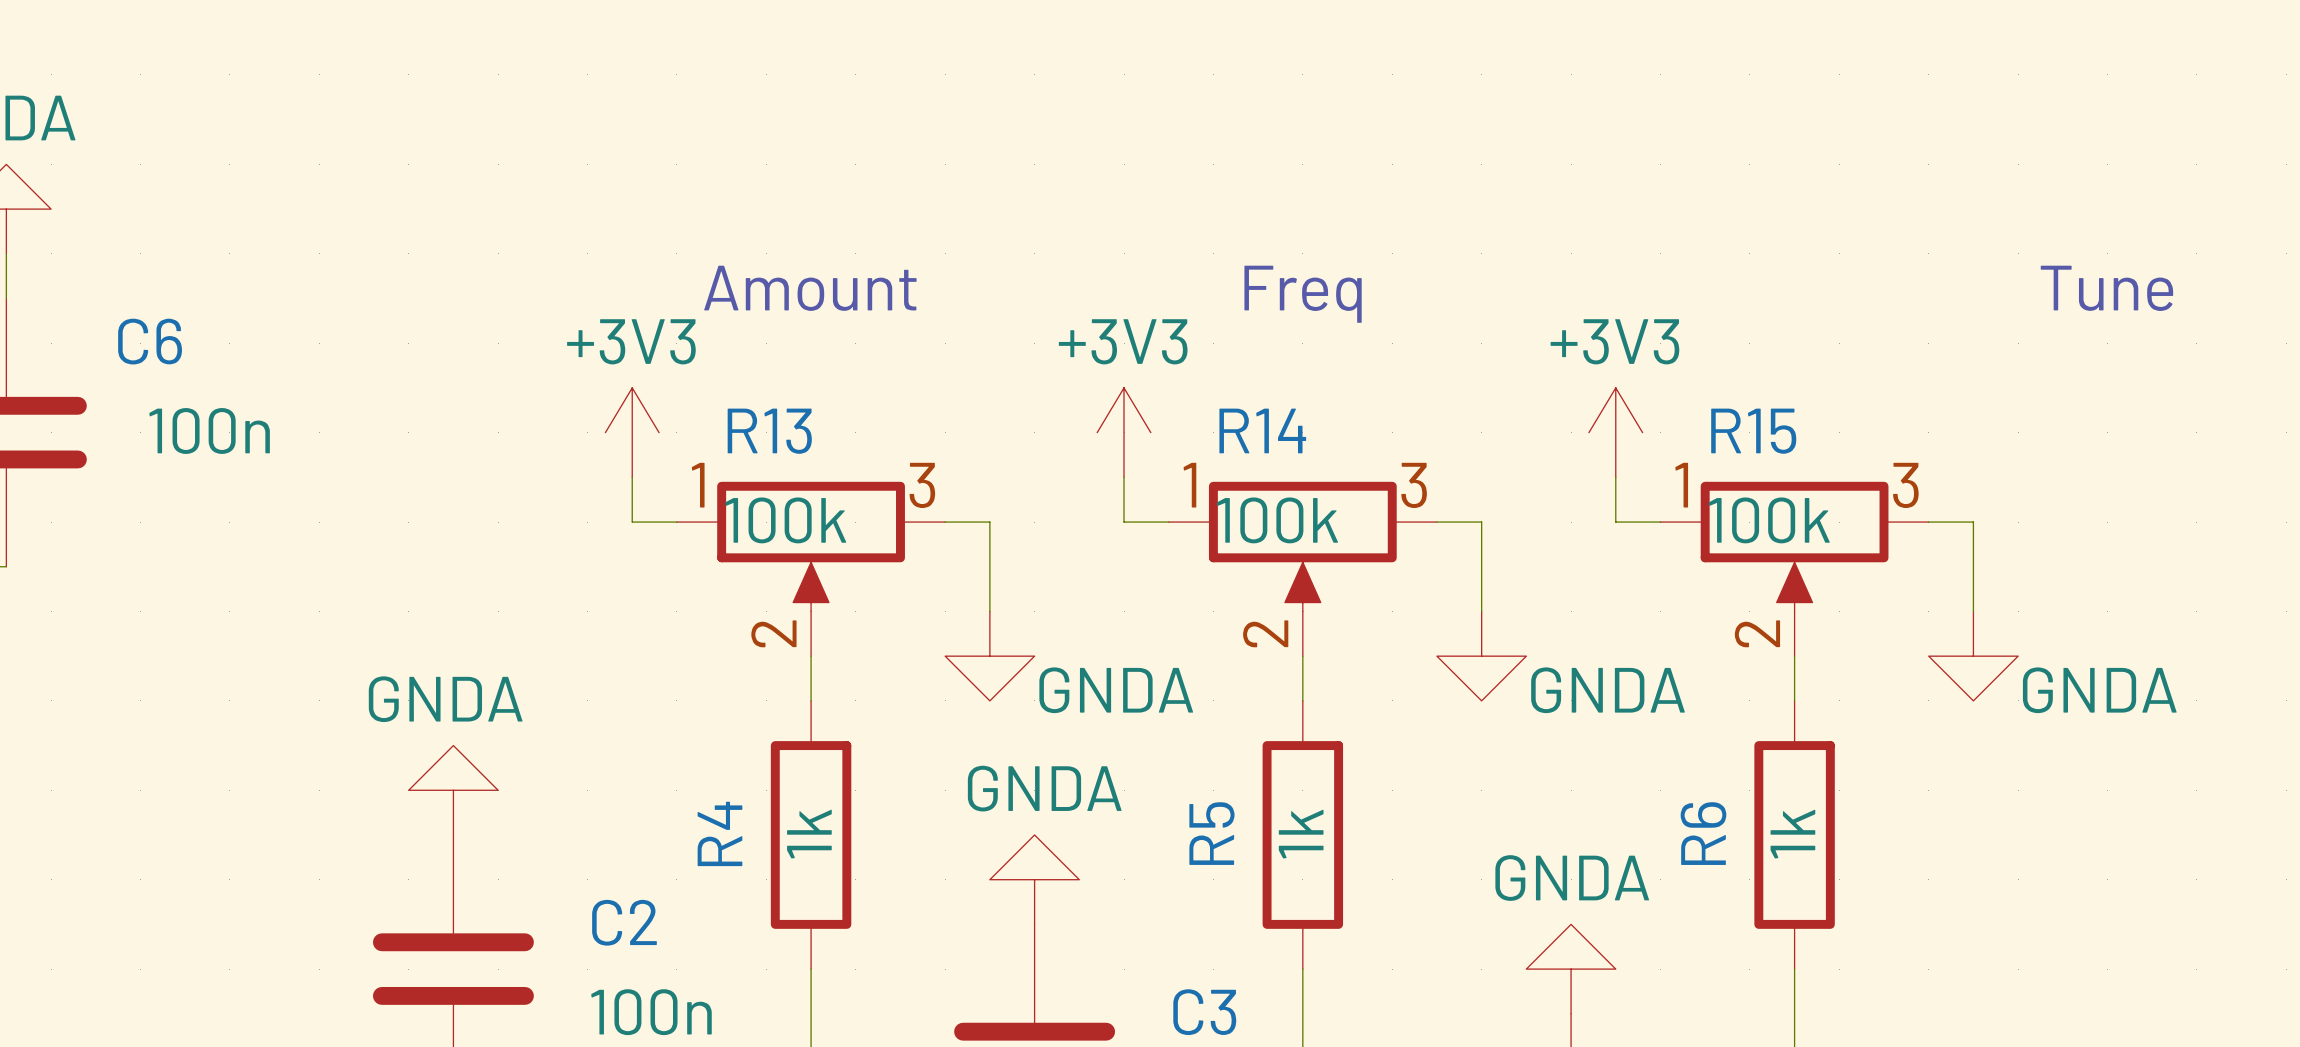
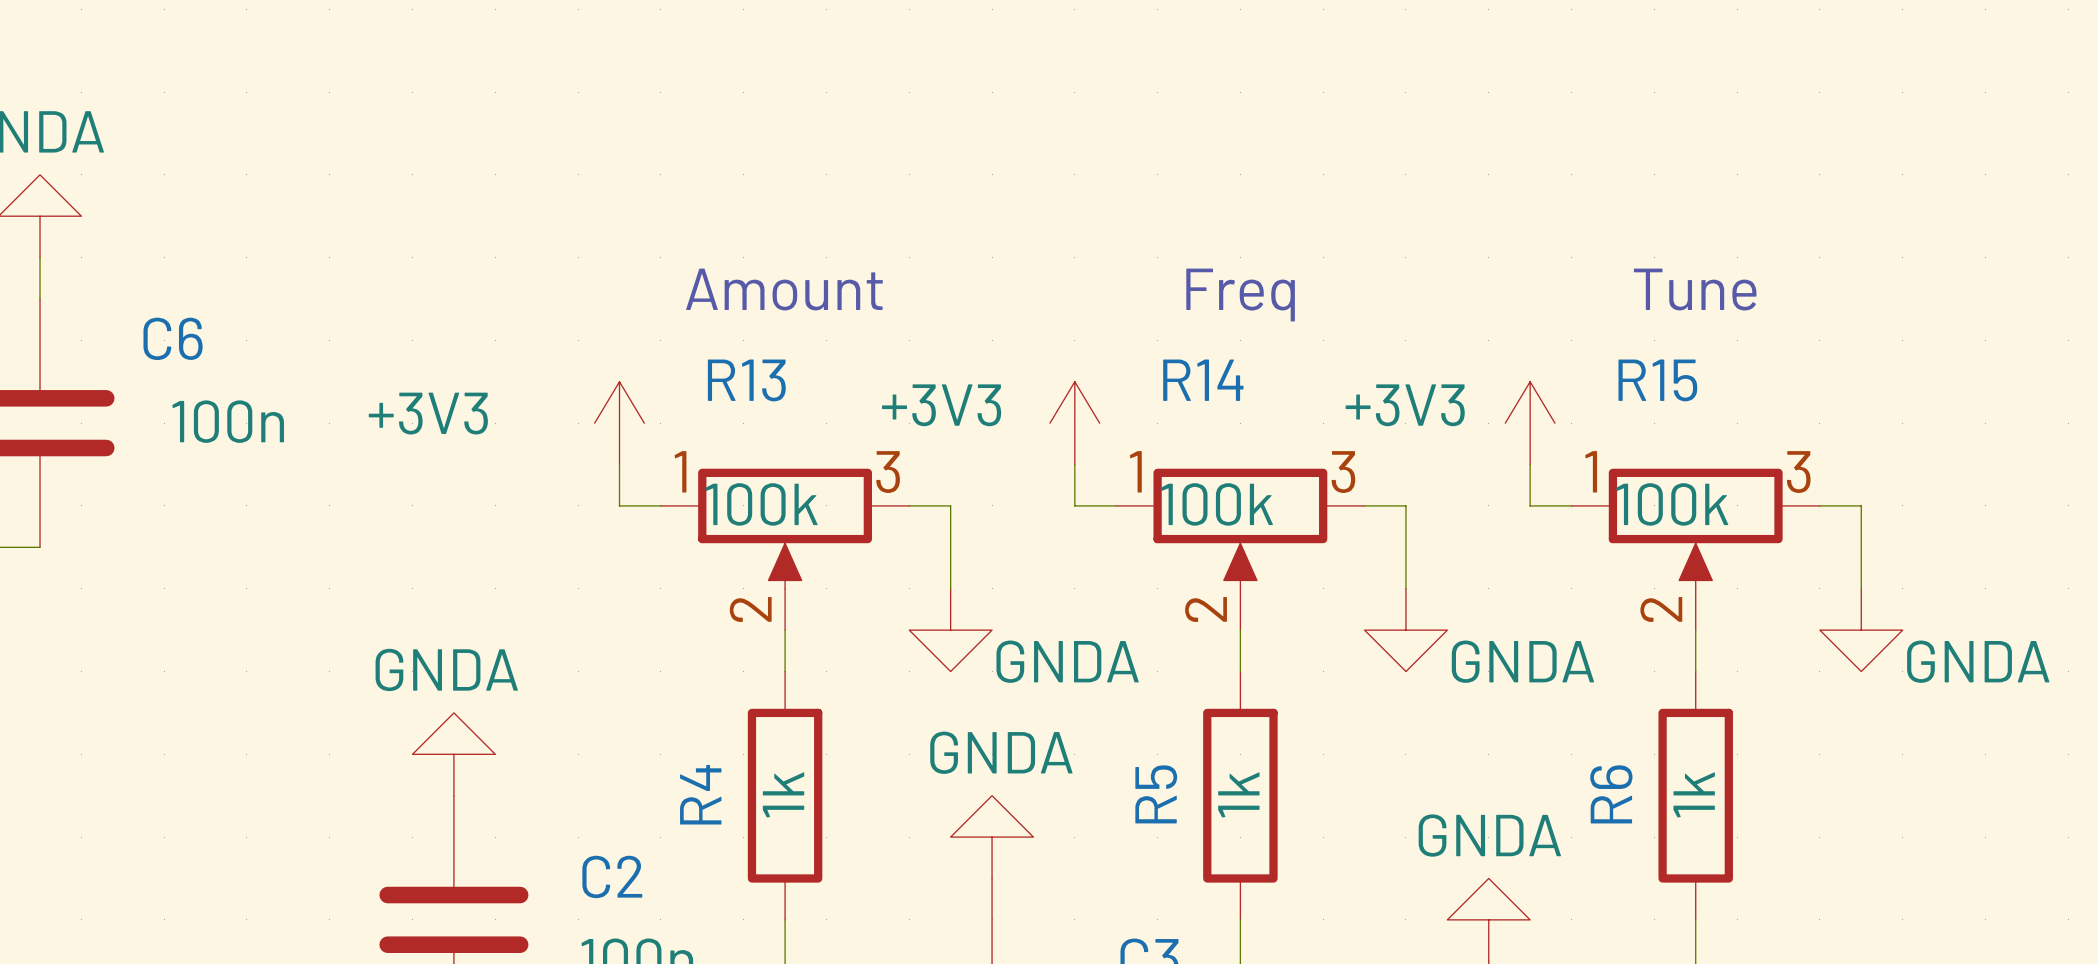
text position: Tune (2106, 288) -> Tune (1695, 289)
power symbol text position: +3V3 (631, 341) -> +3V3 (428, 413)
power symbol text position: +3V3 (1123, 341) -> +3V3 (941, 405)
power symbol text position: +3V3 (1614, 341) -> +3V3 (1405, 405)
R14 name position: R14 (1262, 430) -> R14 (1203, 380)
R13 name position: R13 (769, 431) -> R13 (746, 380)
R15 name position: R15 (1753, 431) -> R15 (1657, 380)

